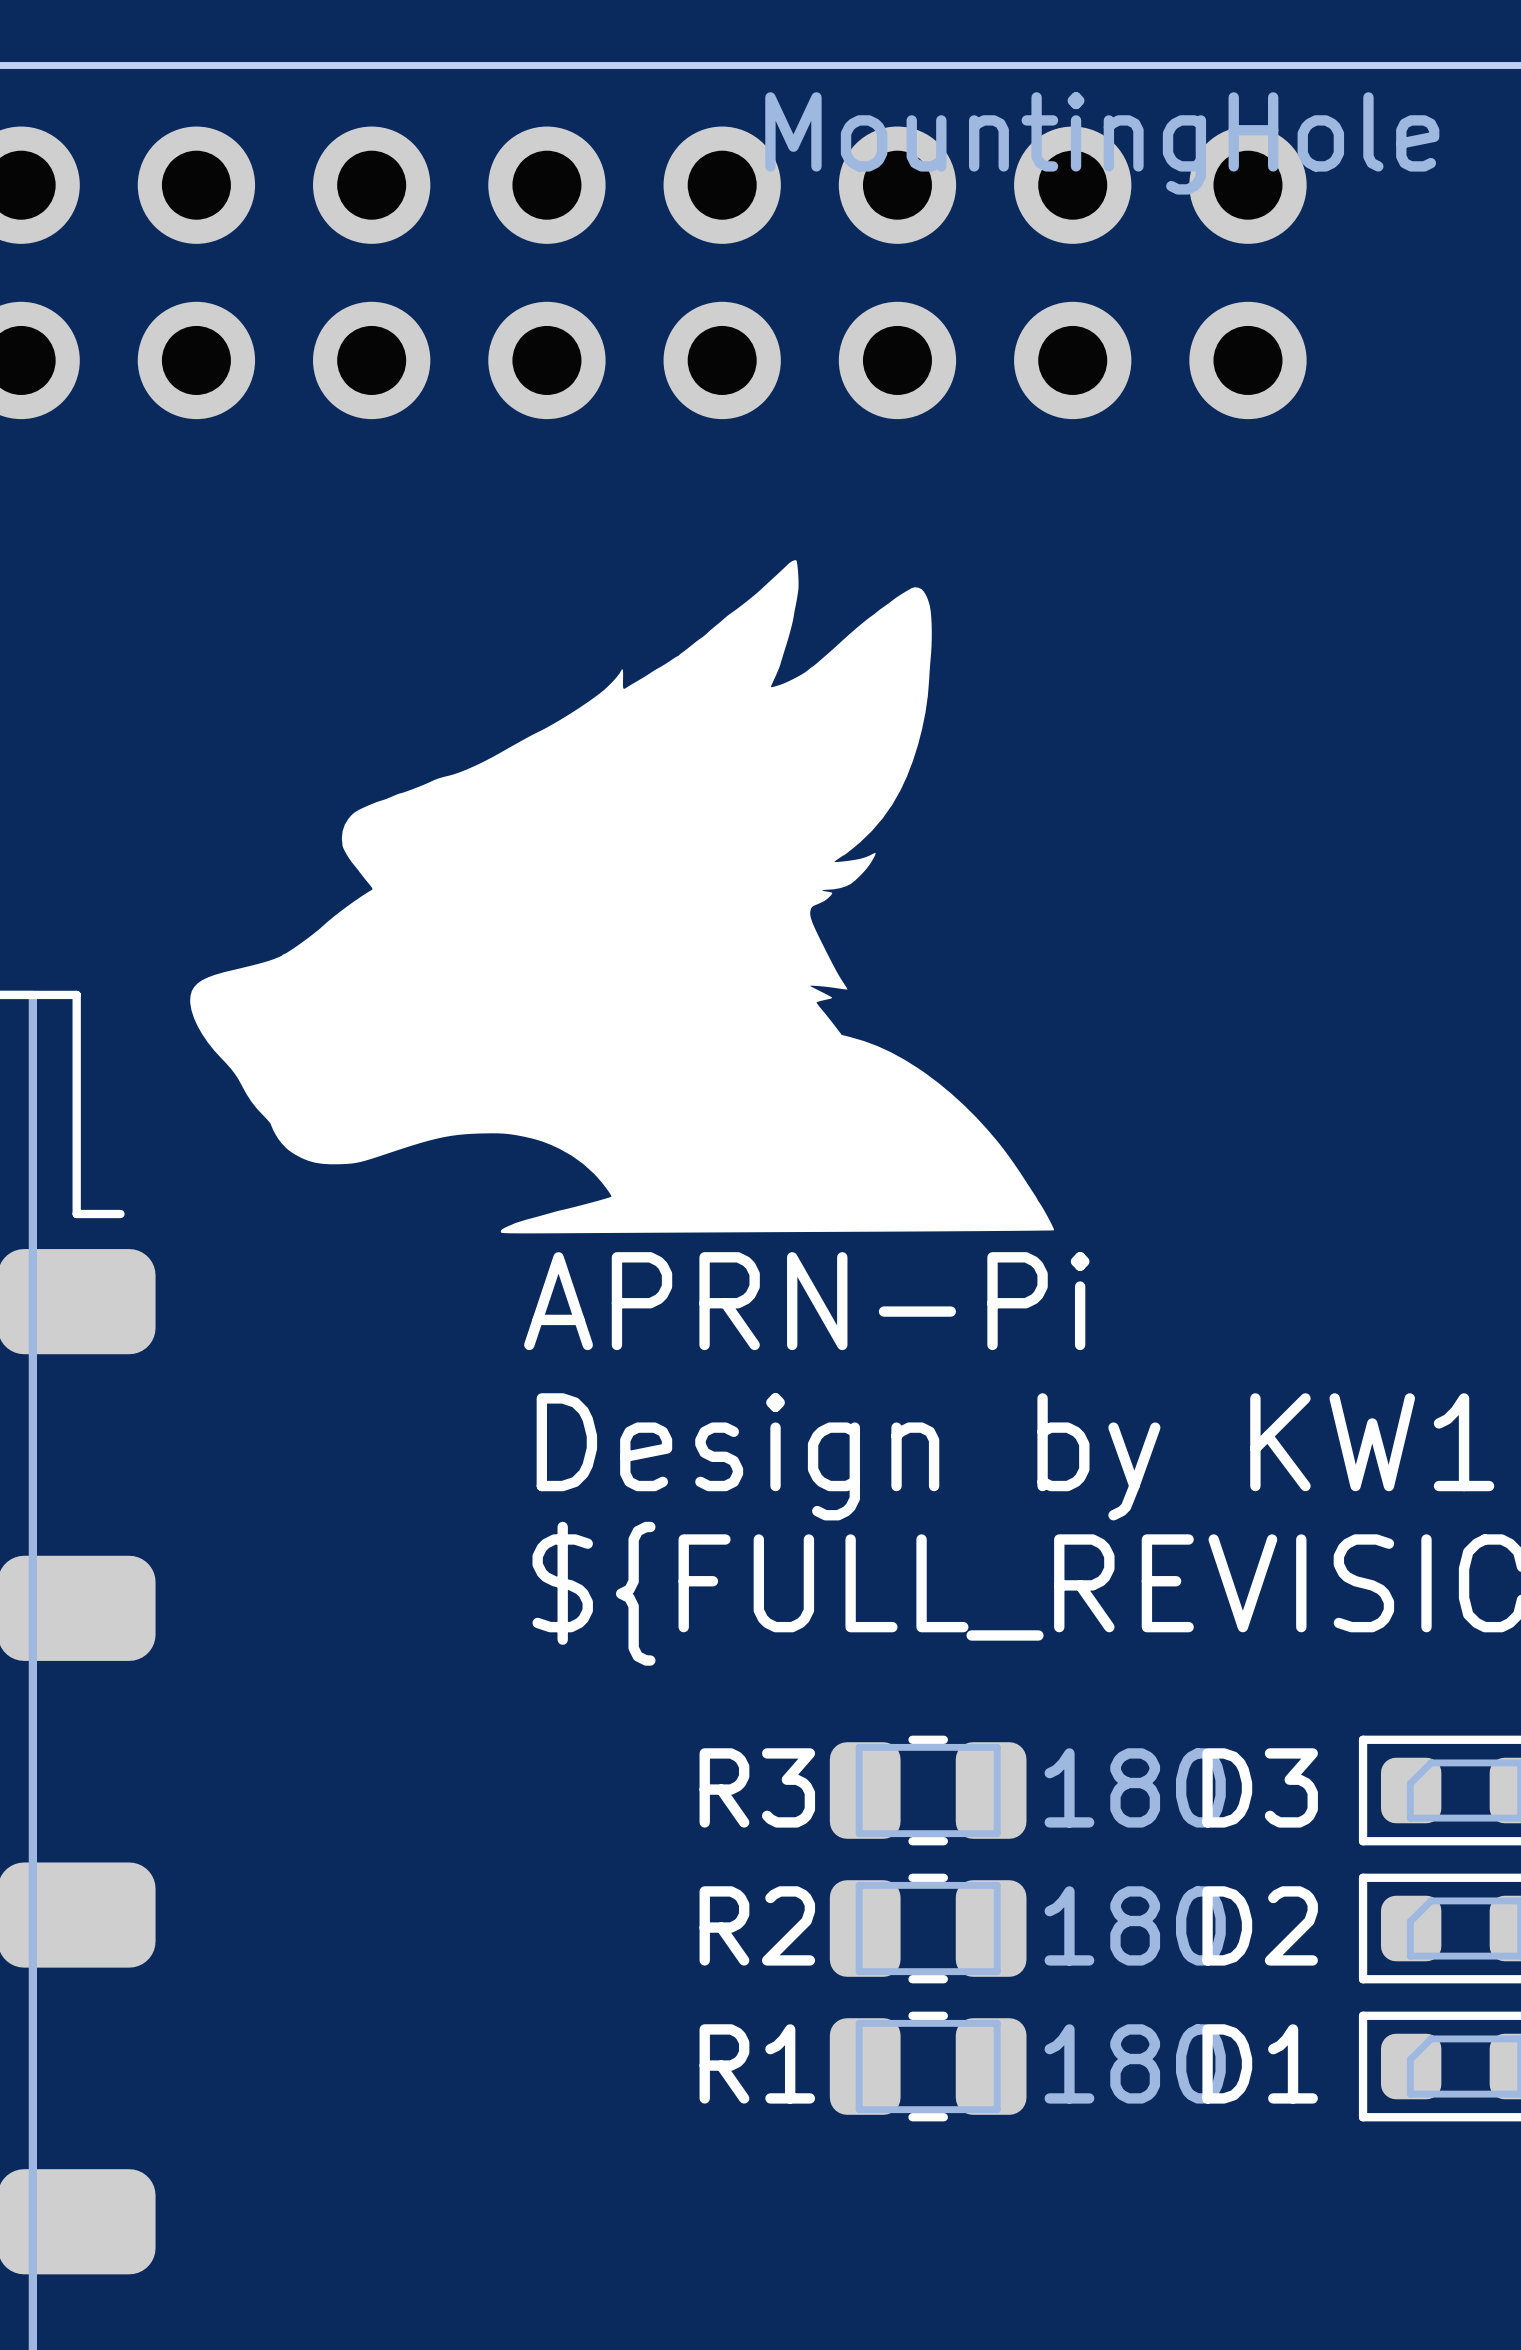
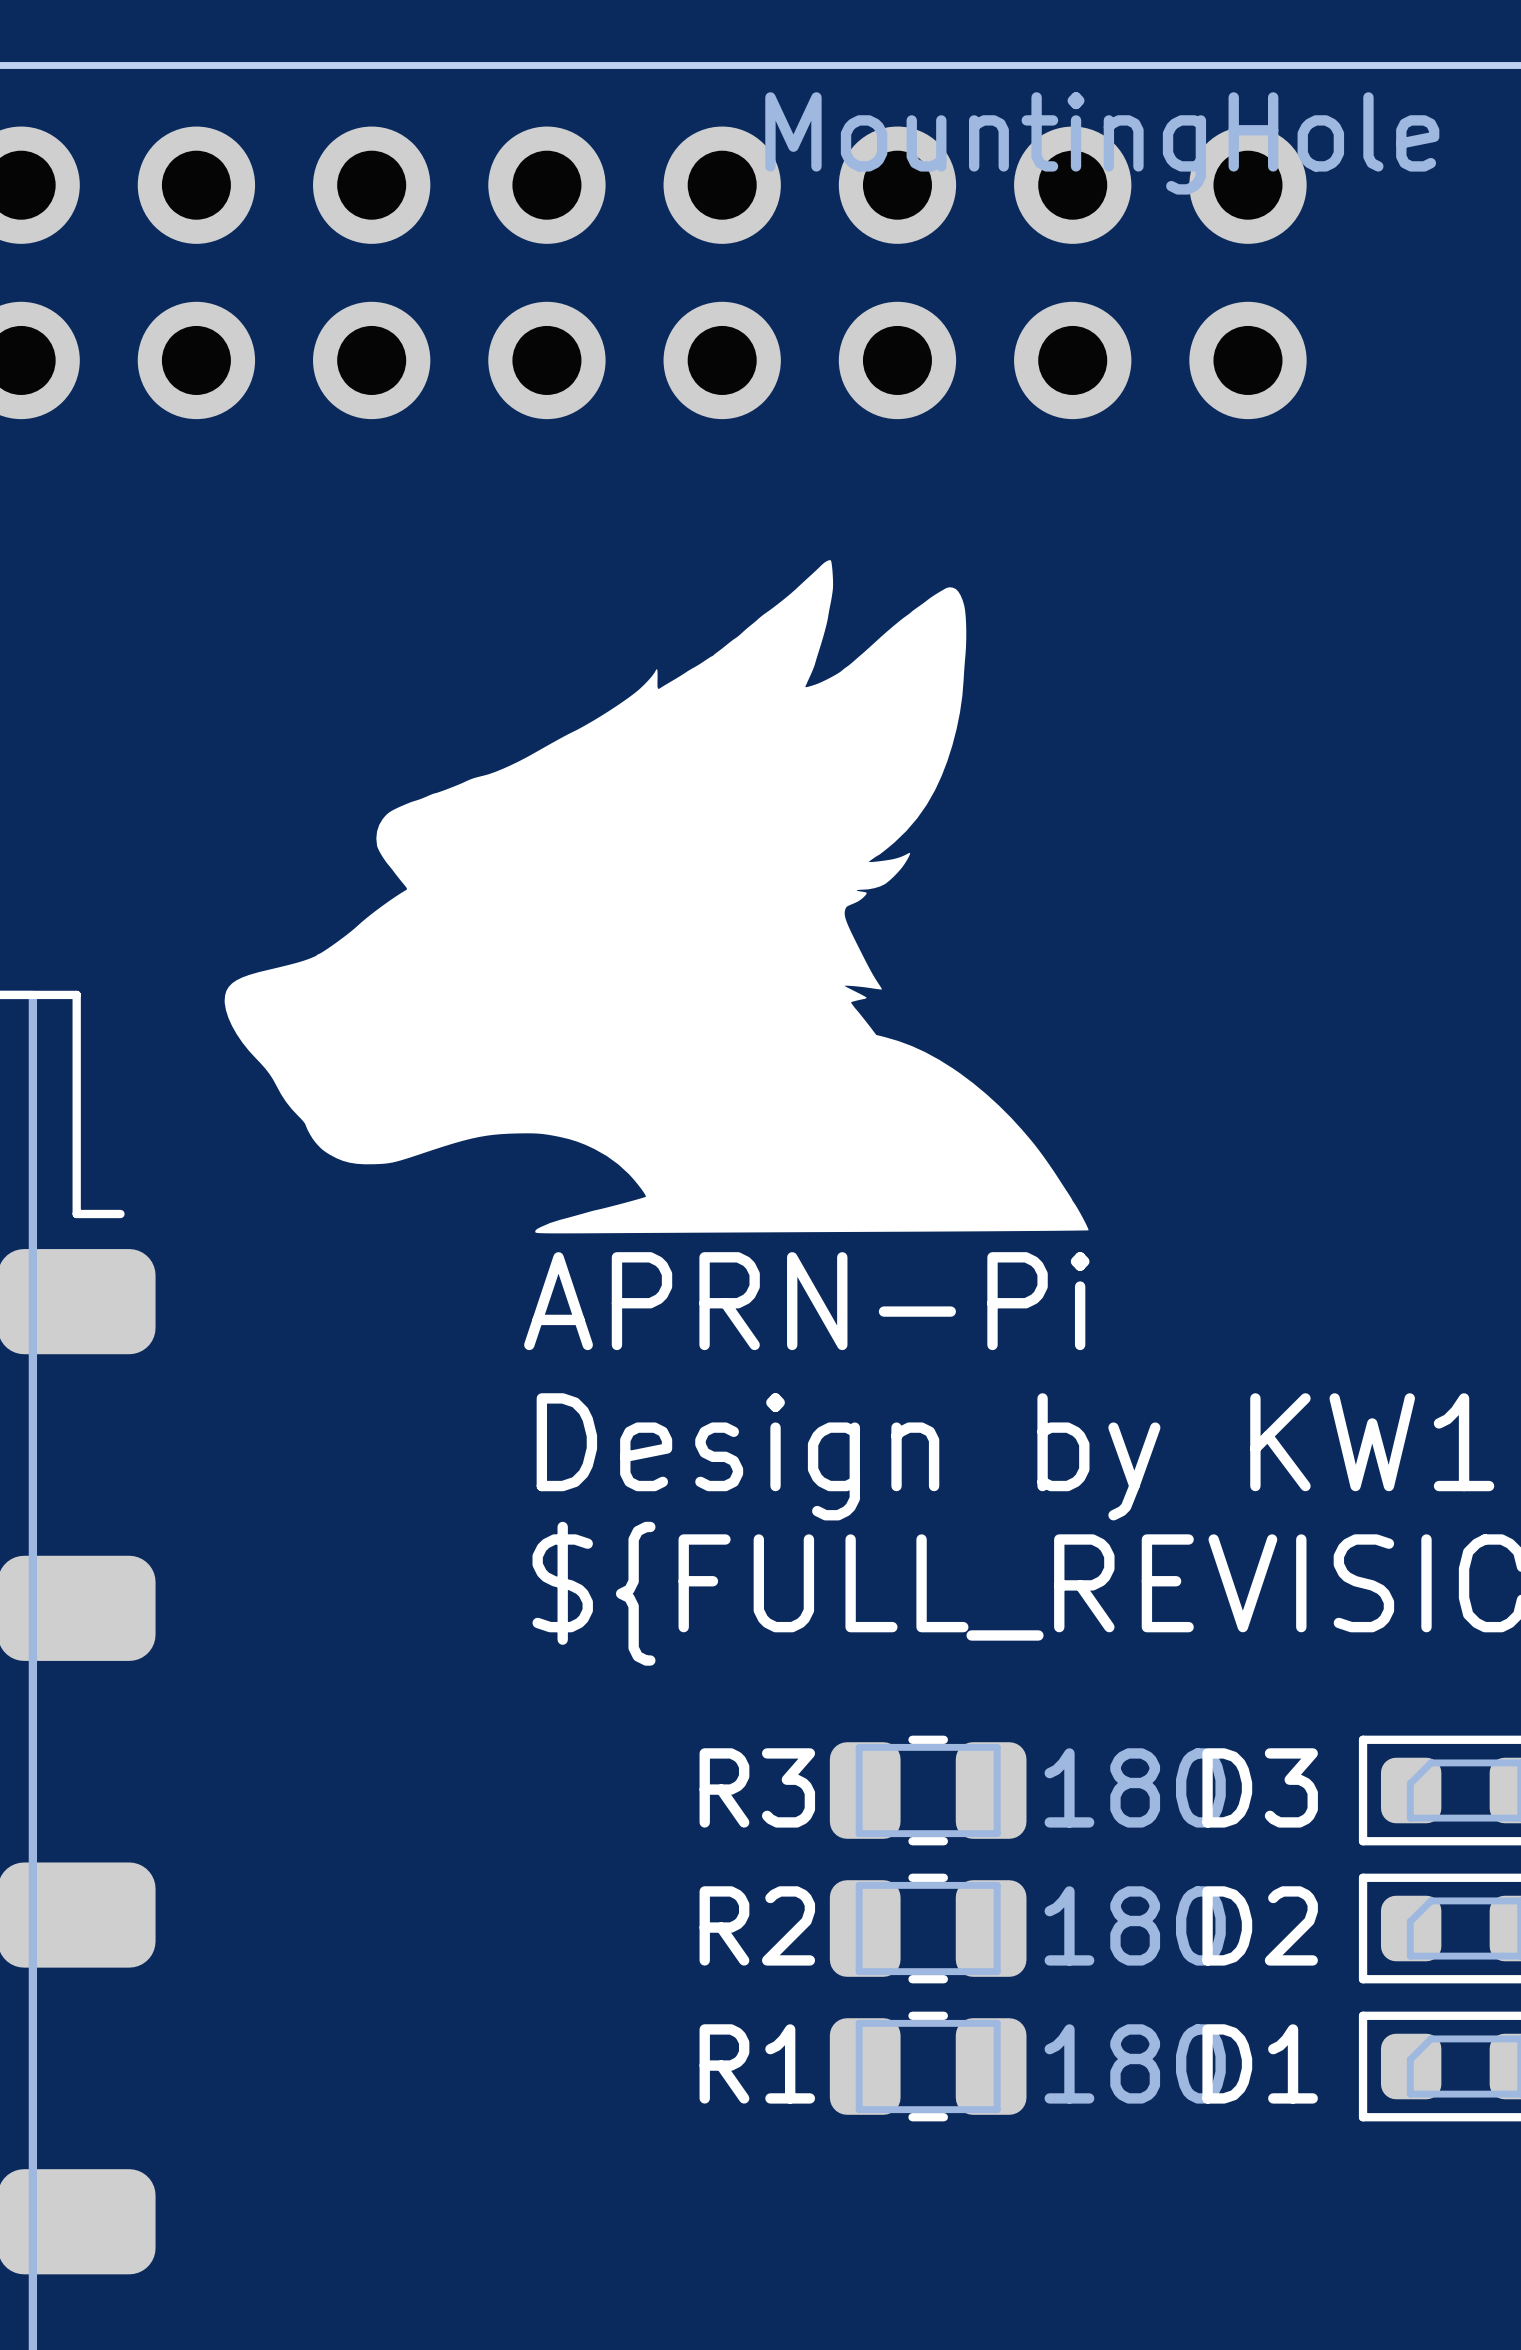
part position: (622, 896) -> (656, 896)

